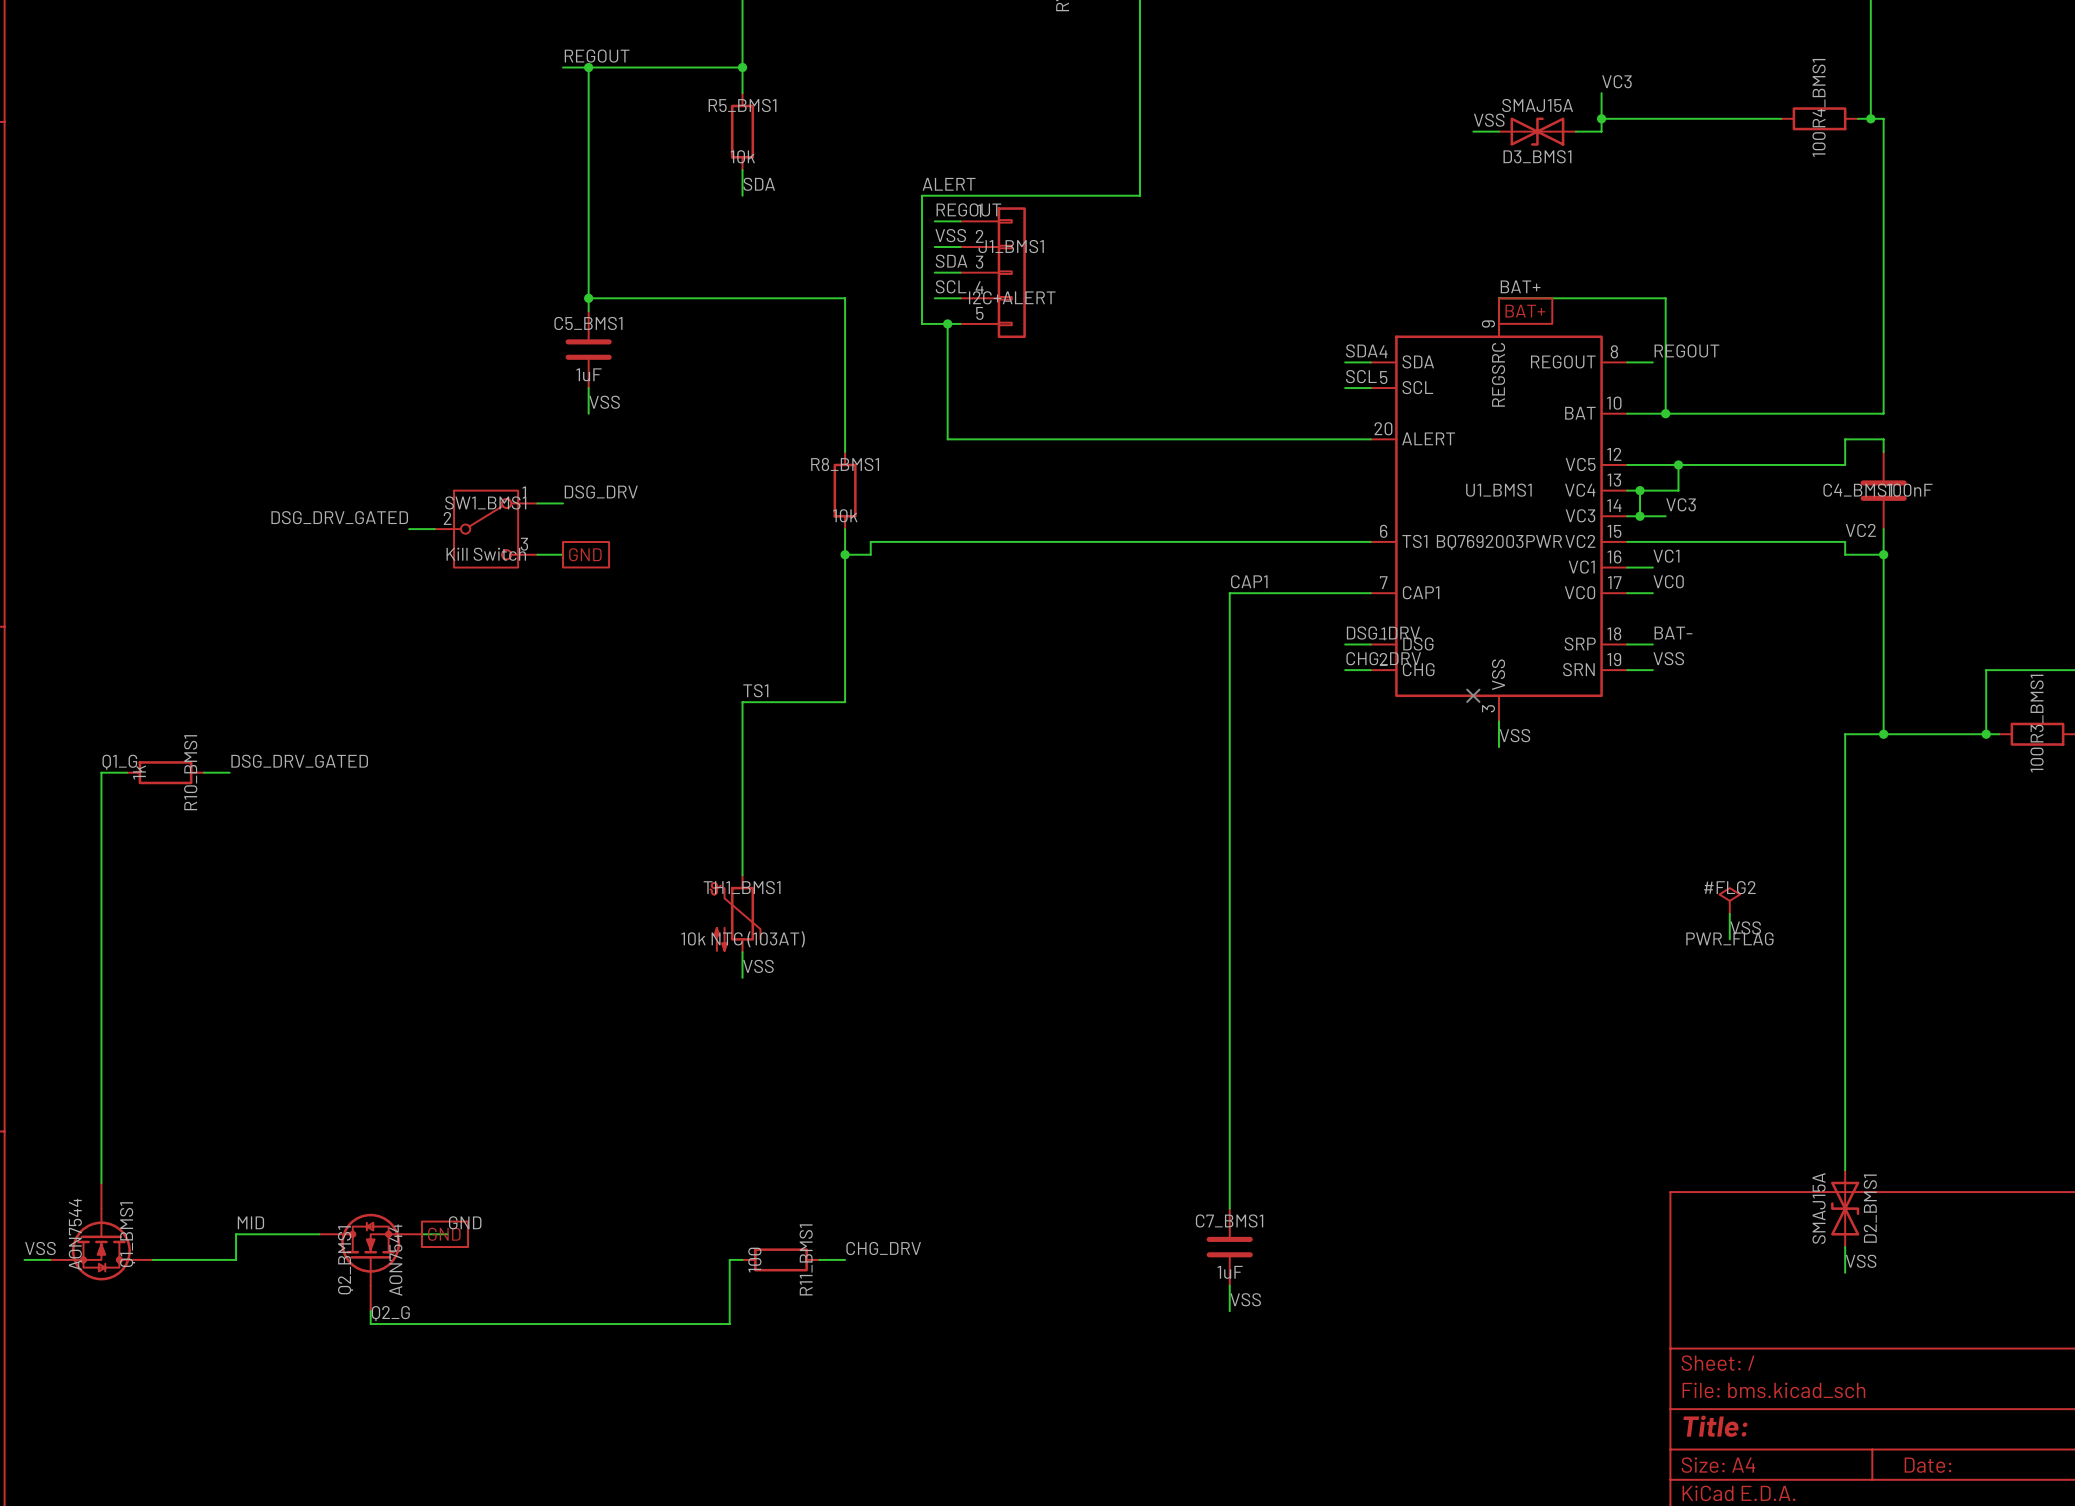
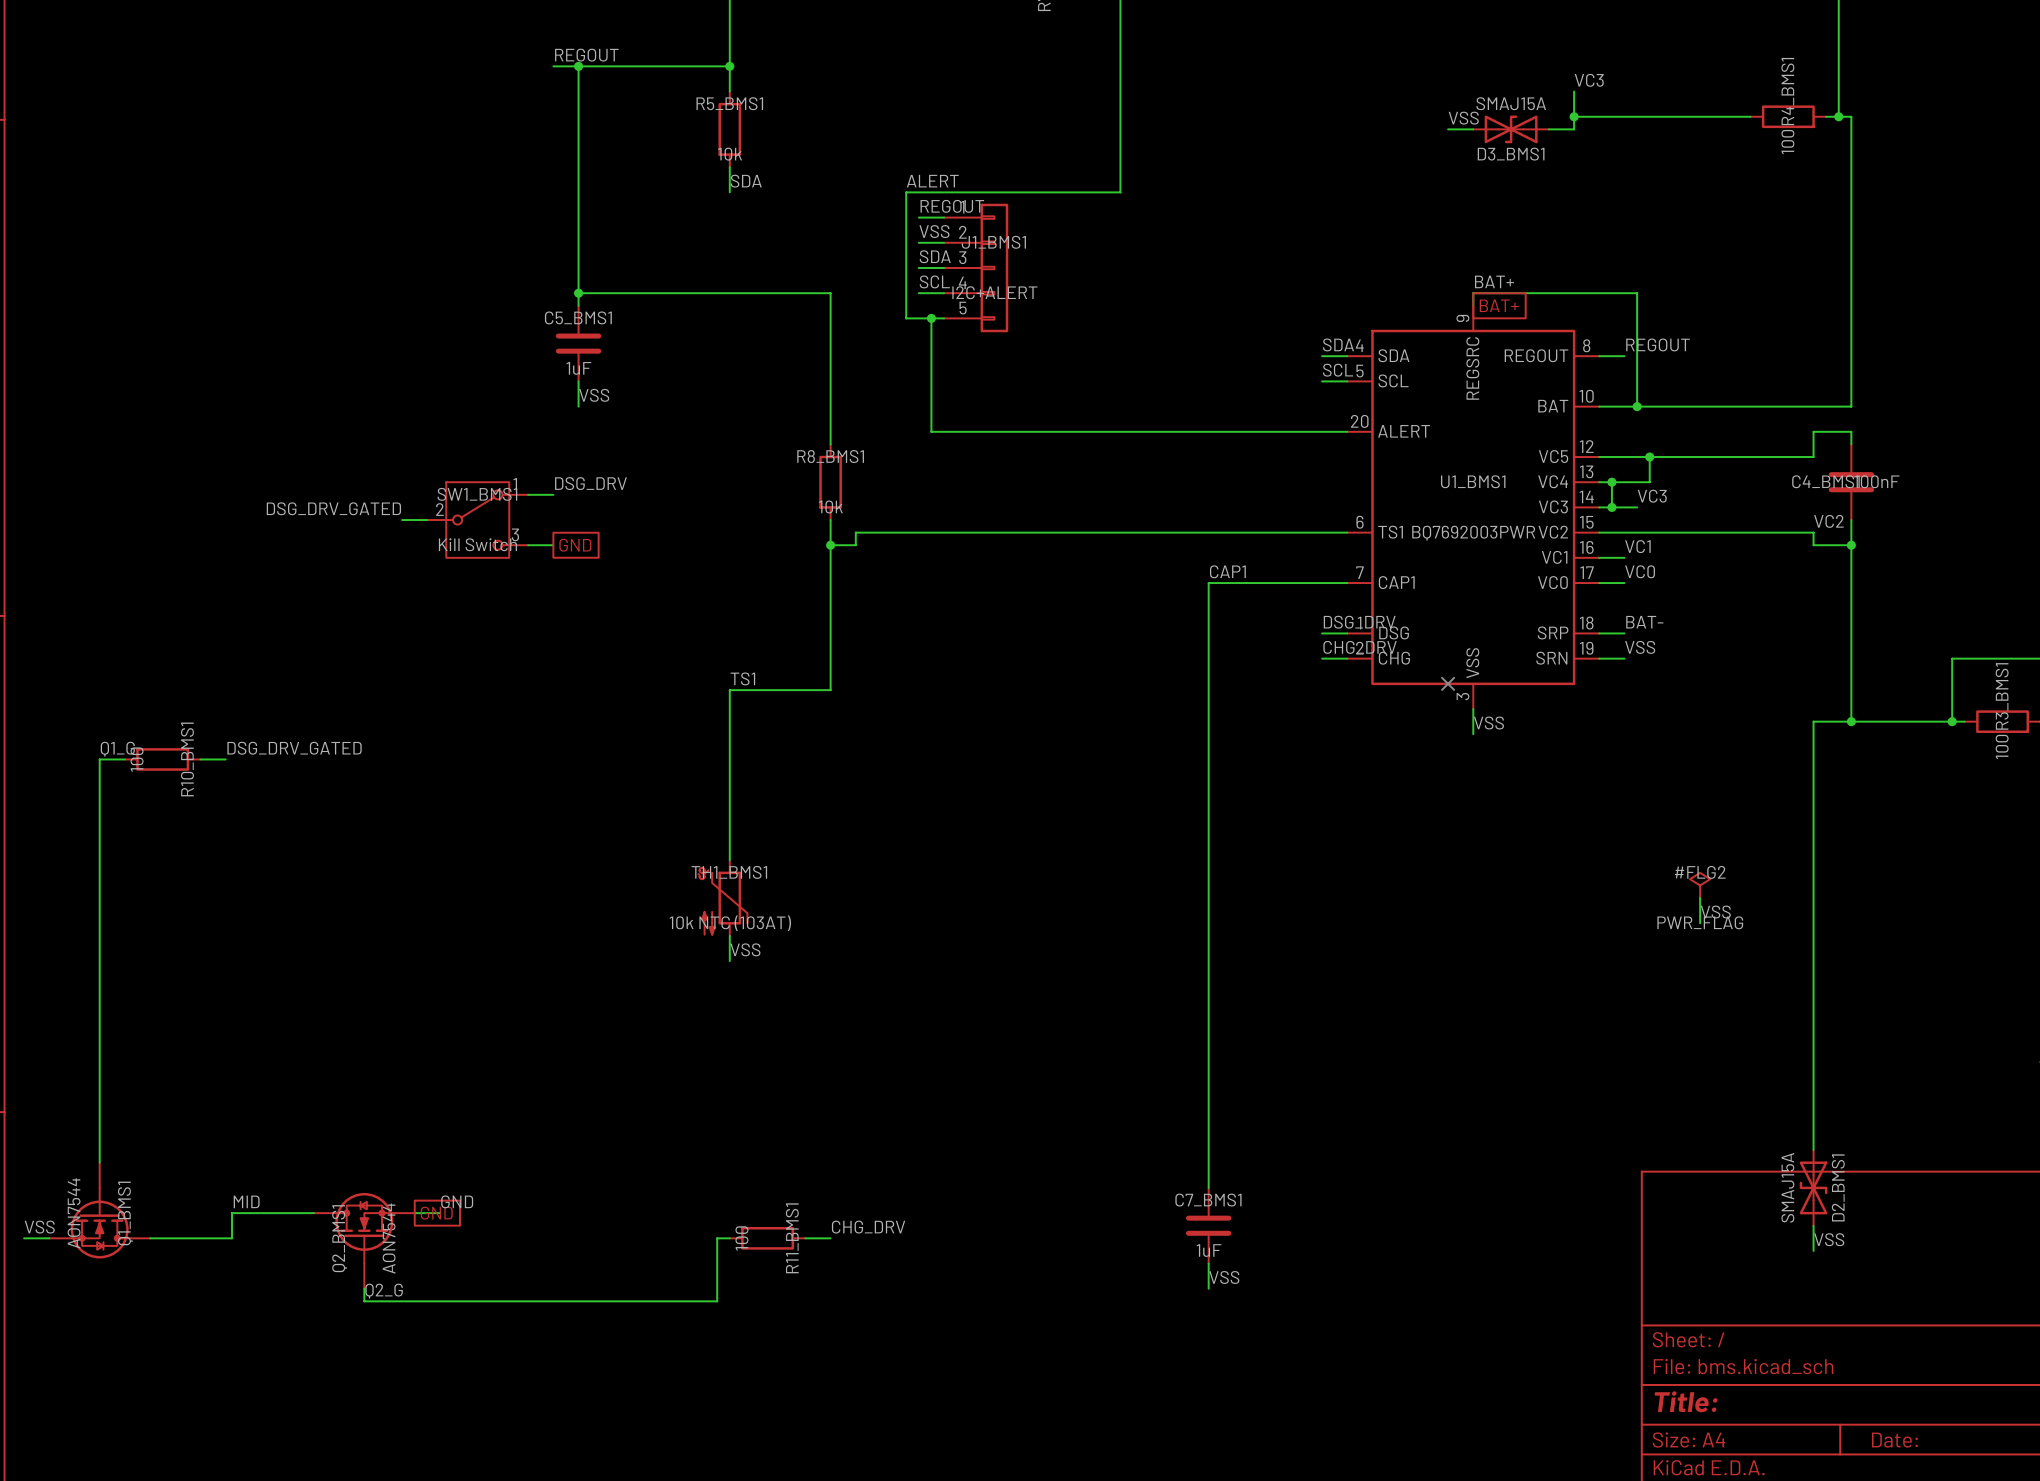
R10_BMS1 value: 1k (139, 772) -> 100 (137, 759)

